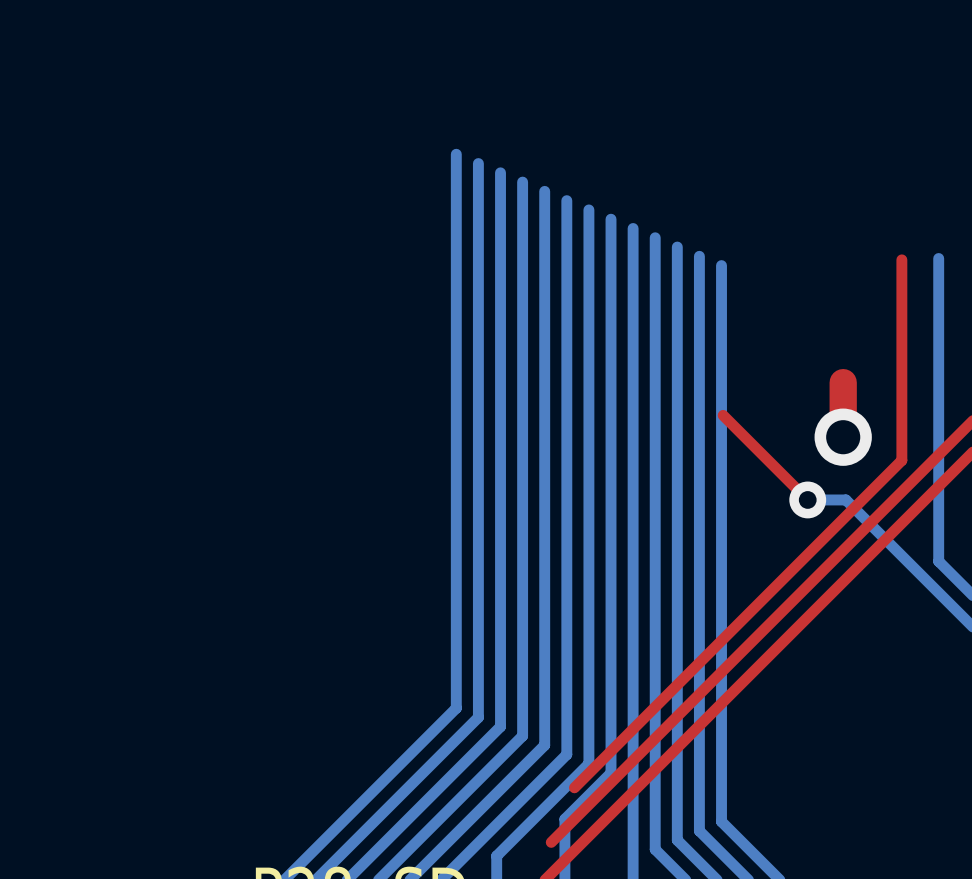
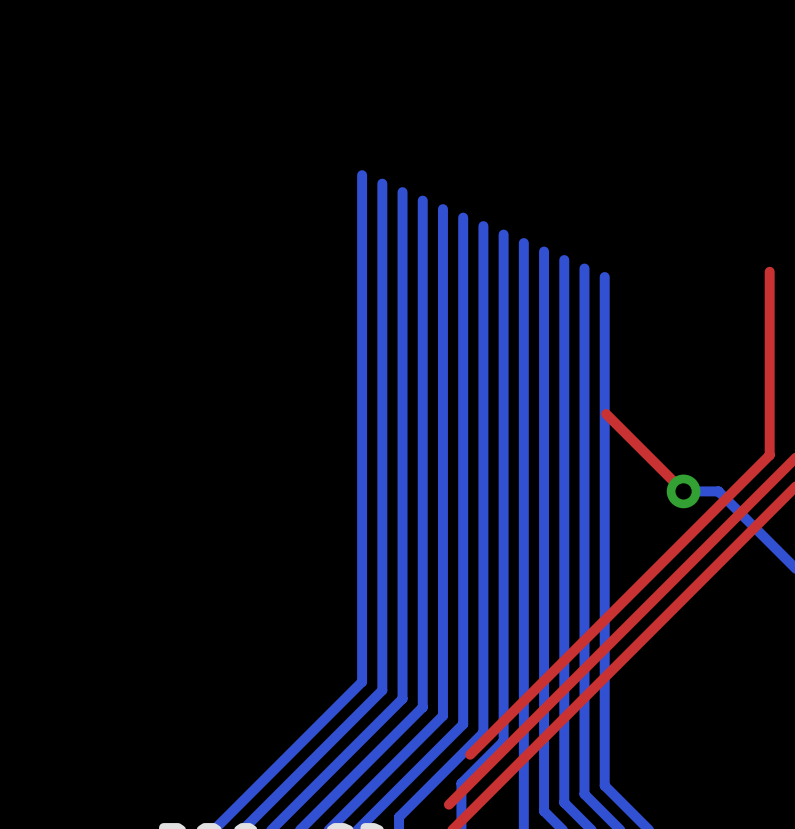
top track: (843, 382) (843, 437) -> none
via: (843, 437) -> none

